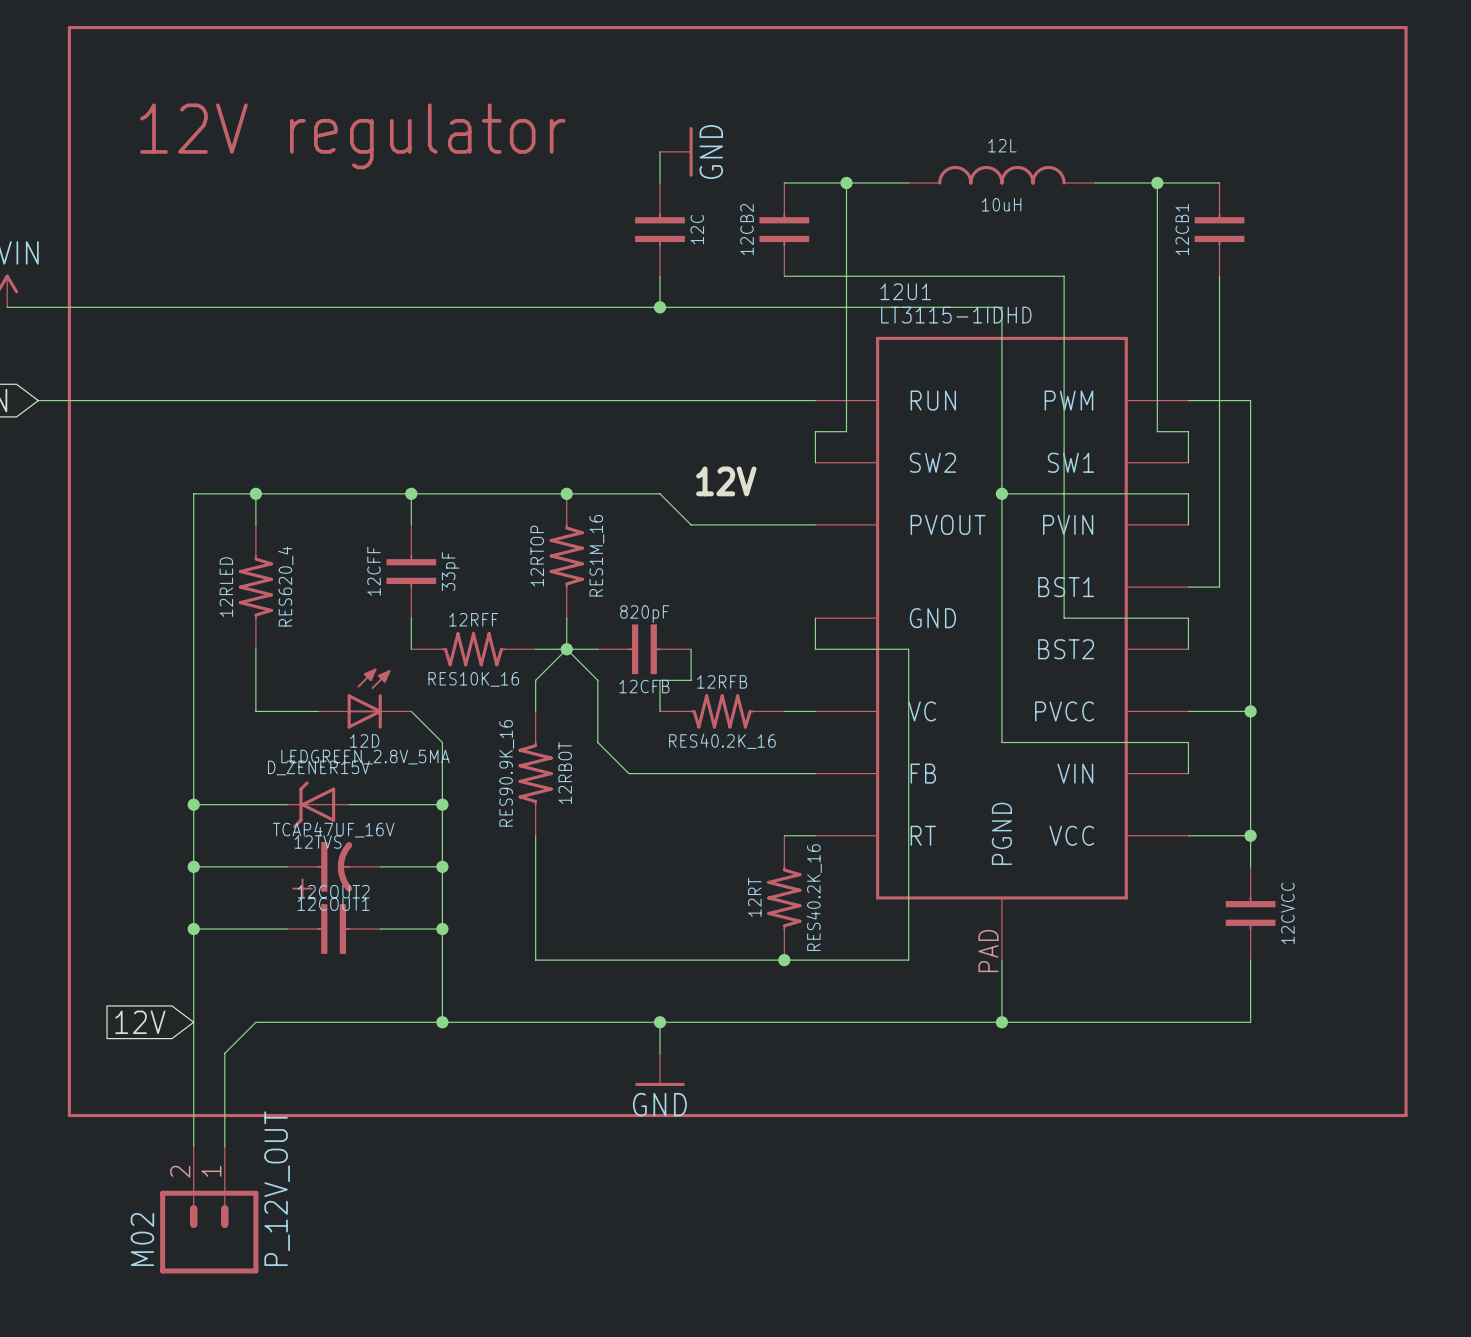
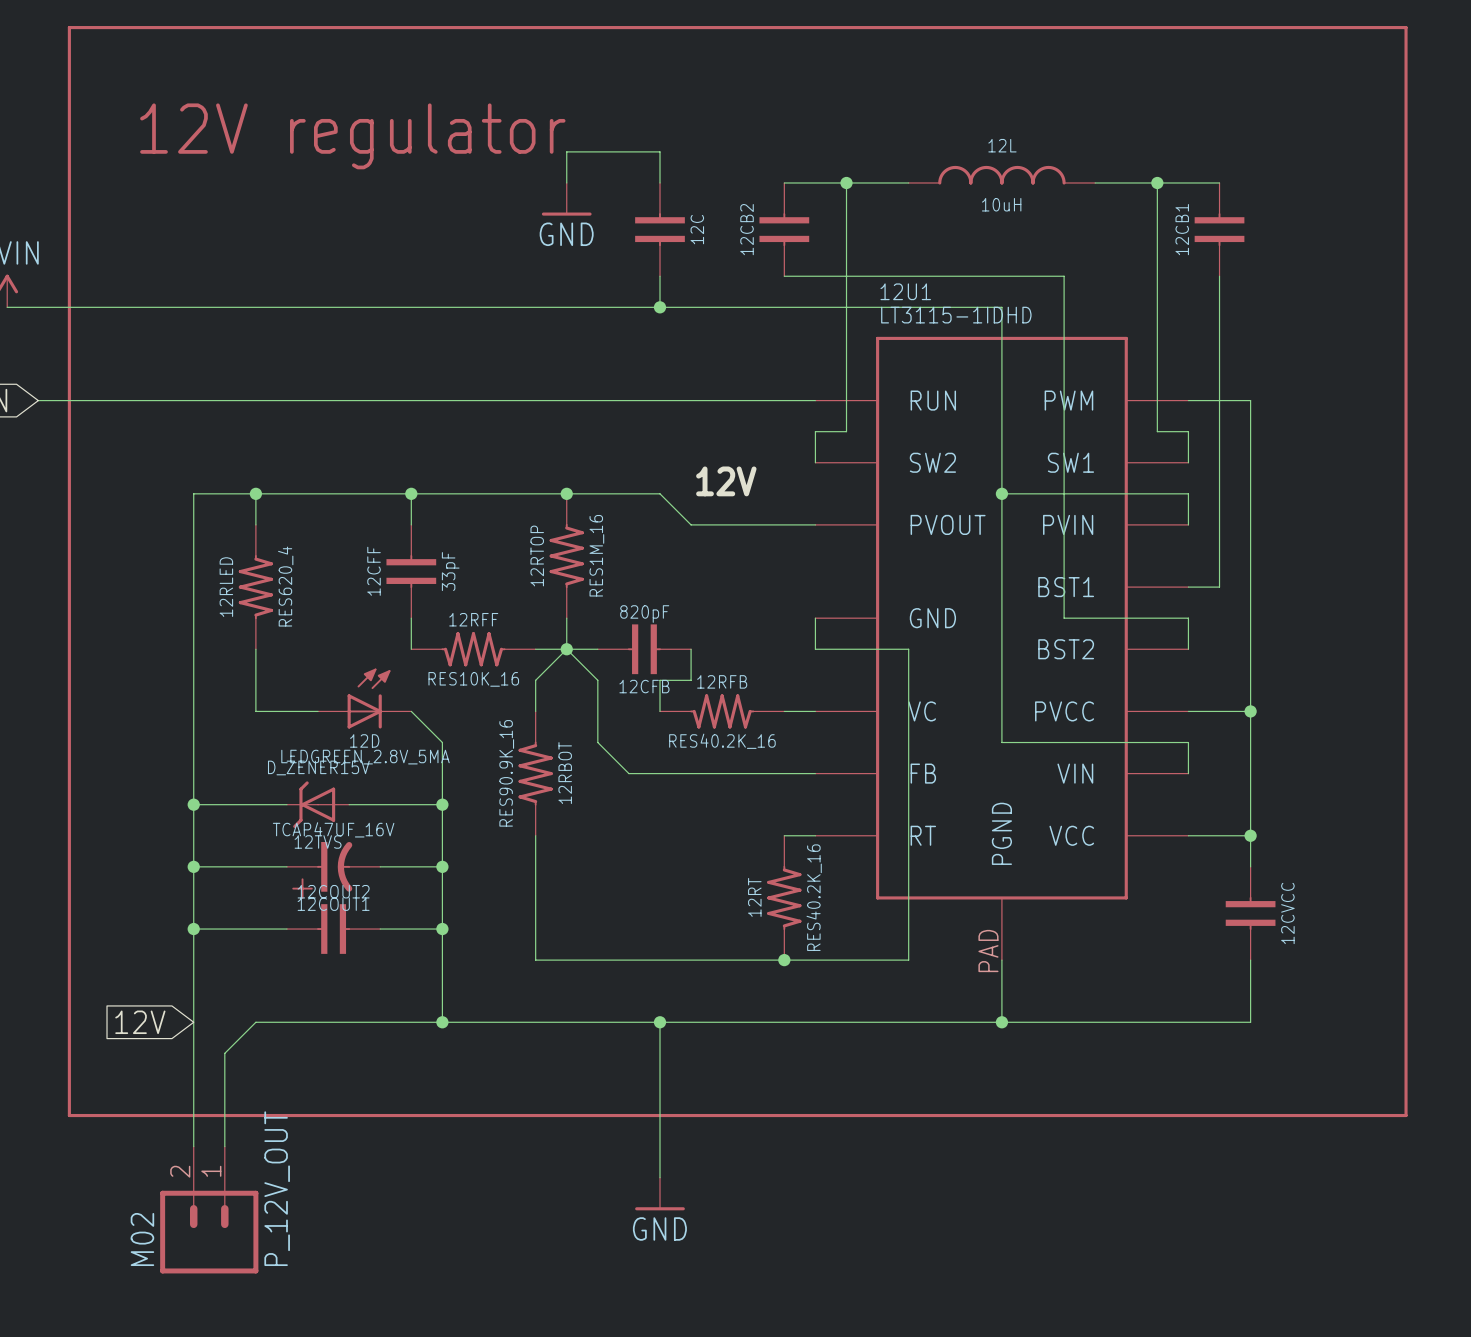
wire: none -> (660, 151) (566, 151) (566, 182)
power symbol position: GND (676, 151) -> GND (566, 199)
power symbol rotation: 0° (691, 151) -> 90° clockwise (566, 214)
wire: none -> (660, 1053) (660, 1177)
power symbol position: GND (660, 1069) -> GND (660, 1194)

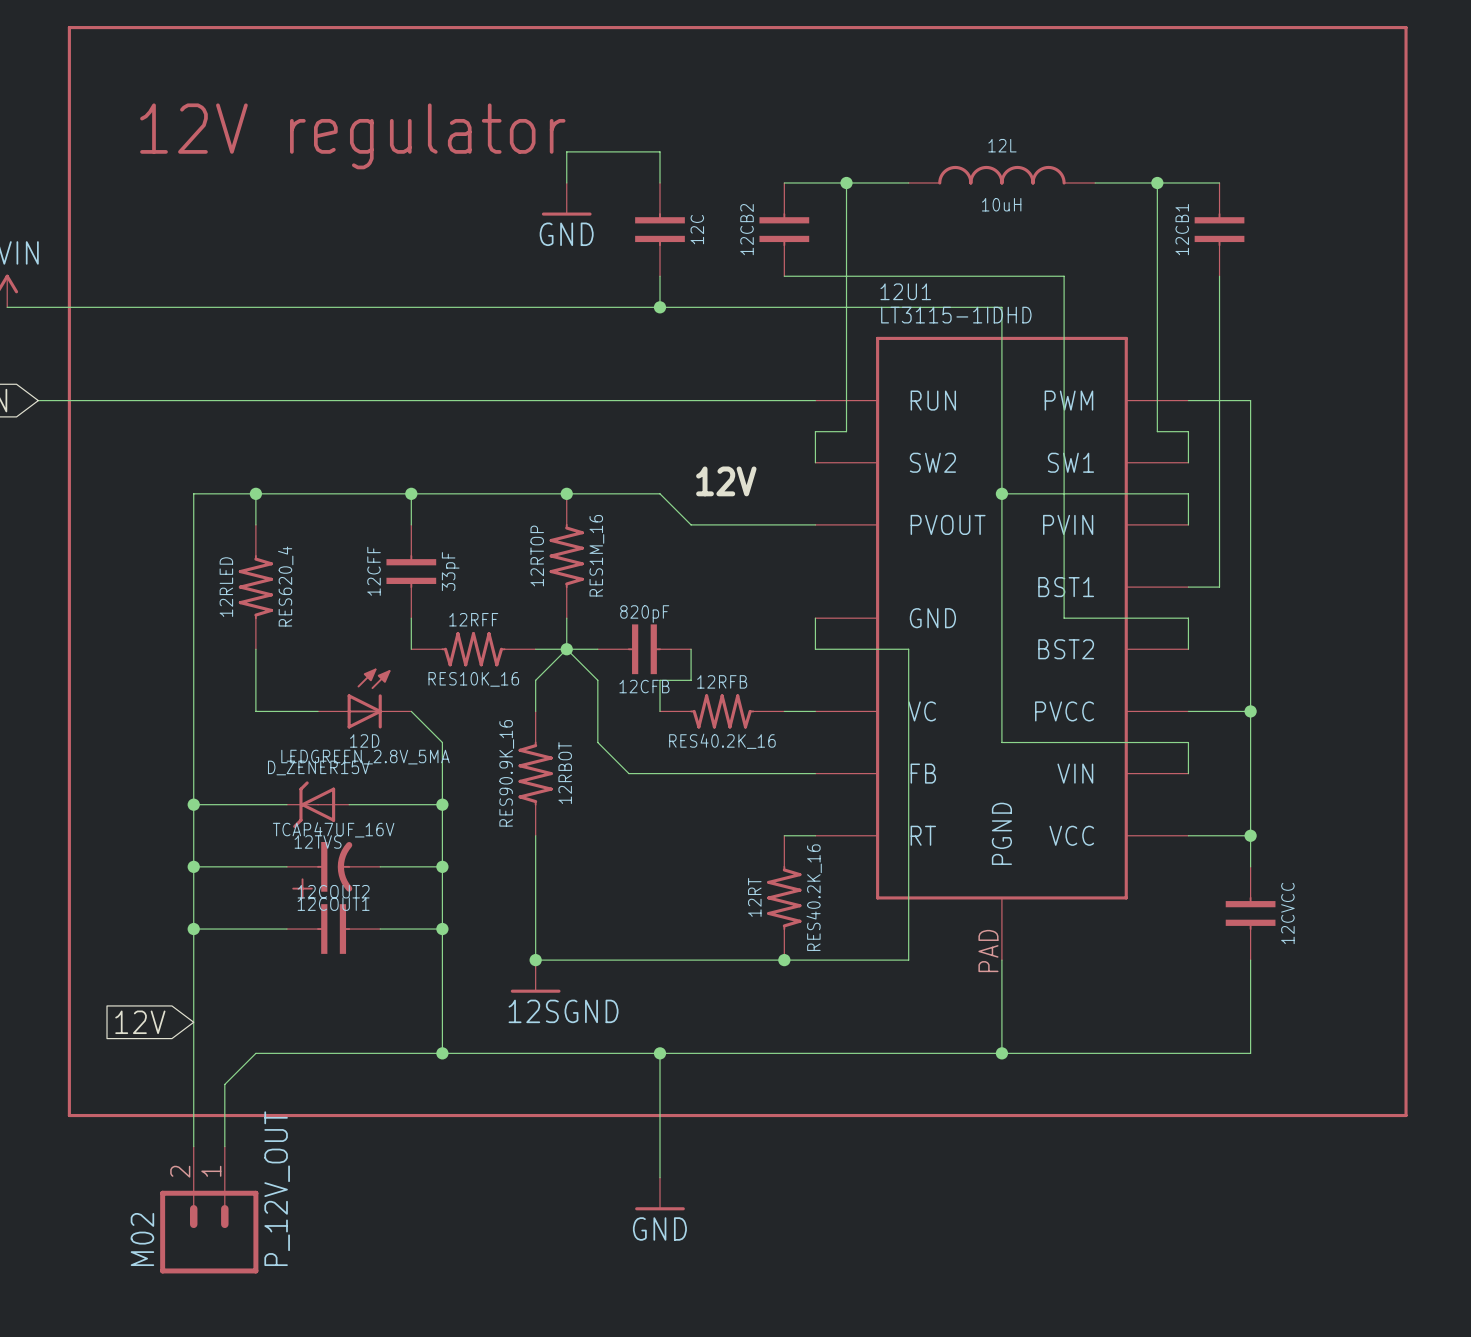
junction: none -> (535, 960)
power symbol: none -> 12SGND (535, 976)
junction position: (442, 1022) -> (442, 1053)
wire: (660, 1022) (660, 1053) -> (442, 1022) (442, 1053)
junction position: (660, 1022) -> (660, 1053)
wire: none -> (1001, 1022) (1001, 1053)
junction position: (1001, 1022) -> (1001, 1053)
wire: (1250, 1022) (255, 1022) (224, 1053) (224, 1084) -> (1250, 1022) (1250, 1053) (255, 1053) (224, 1084)

